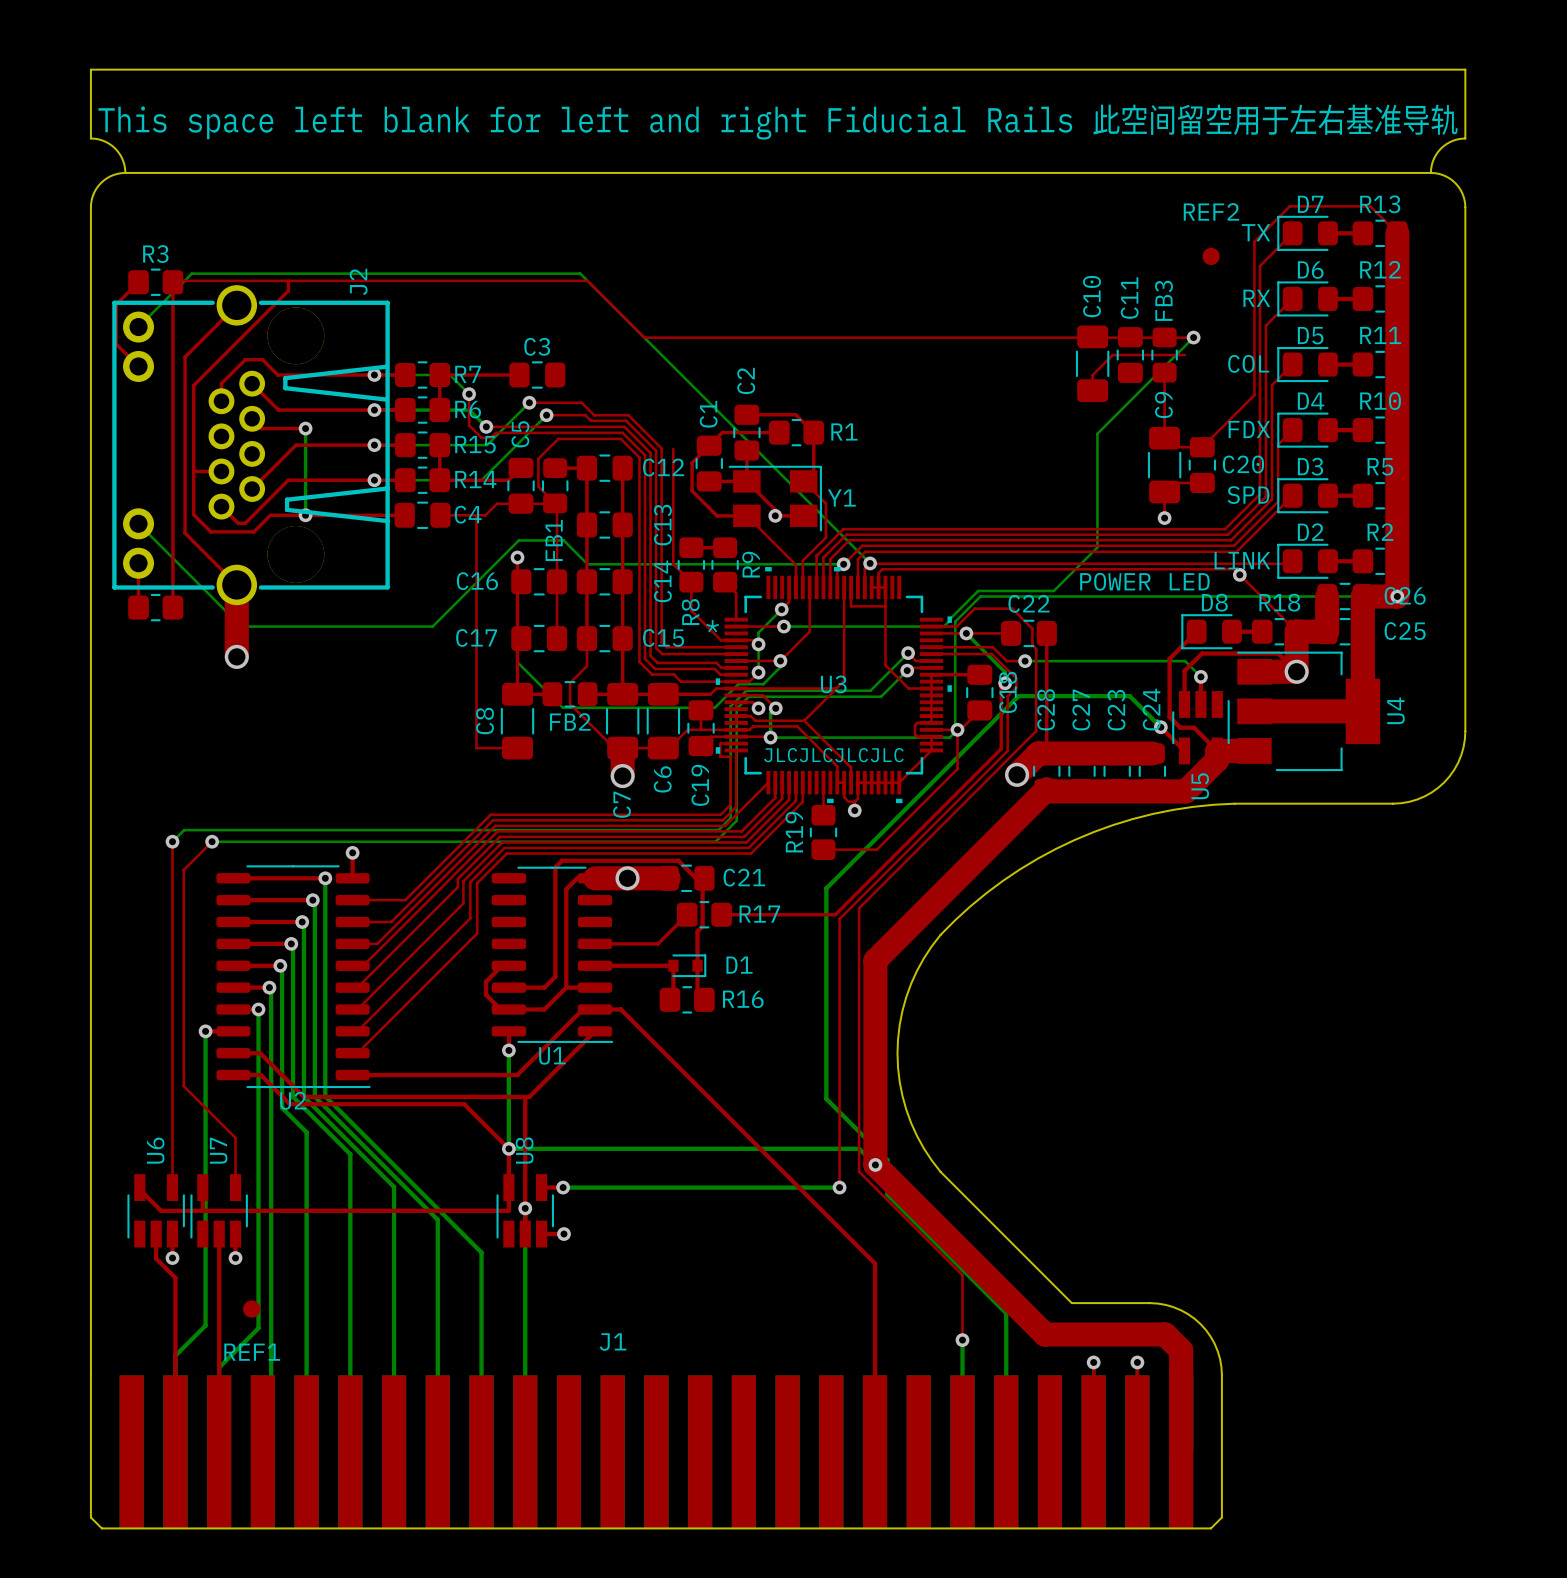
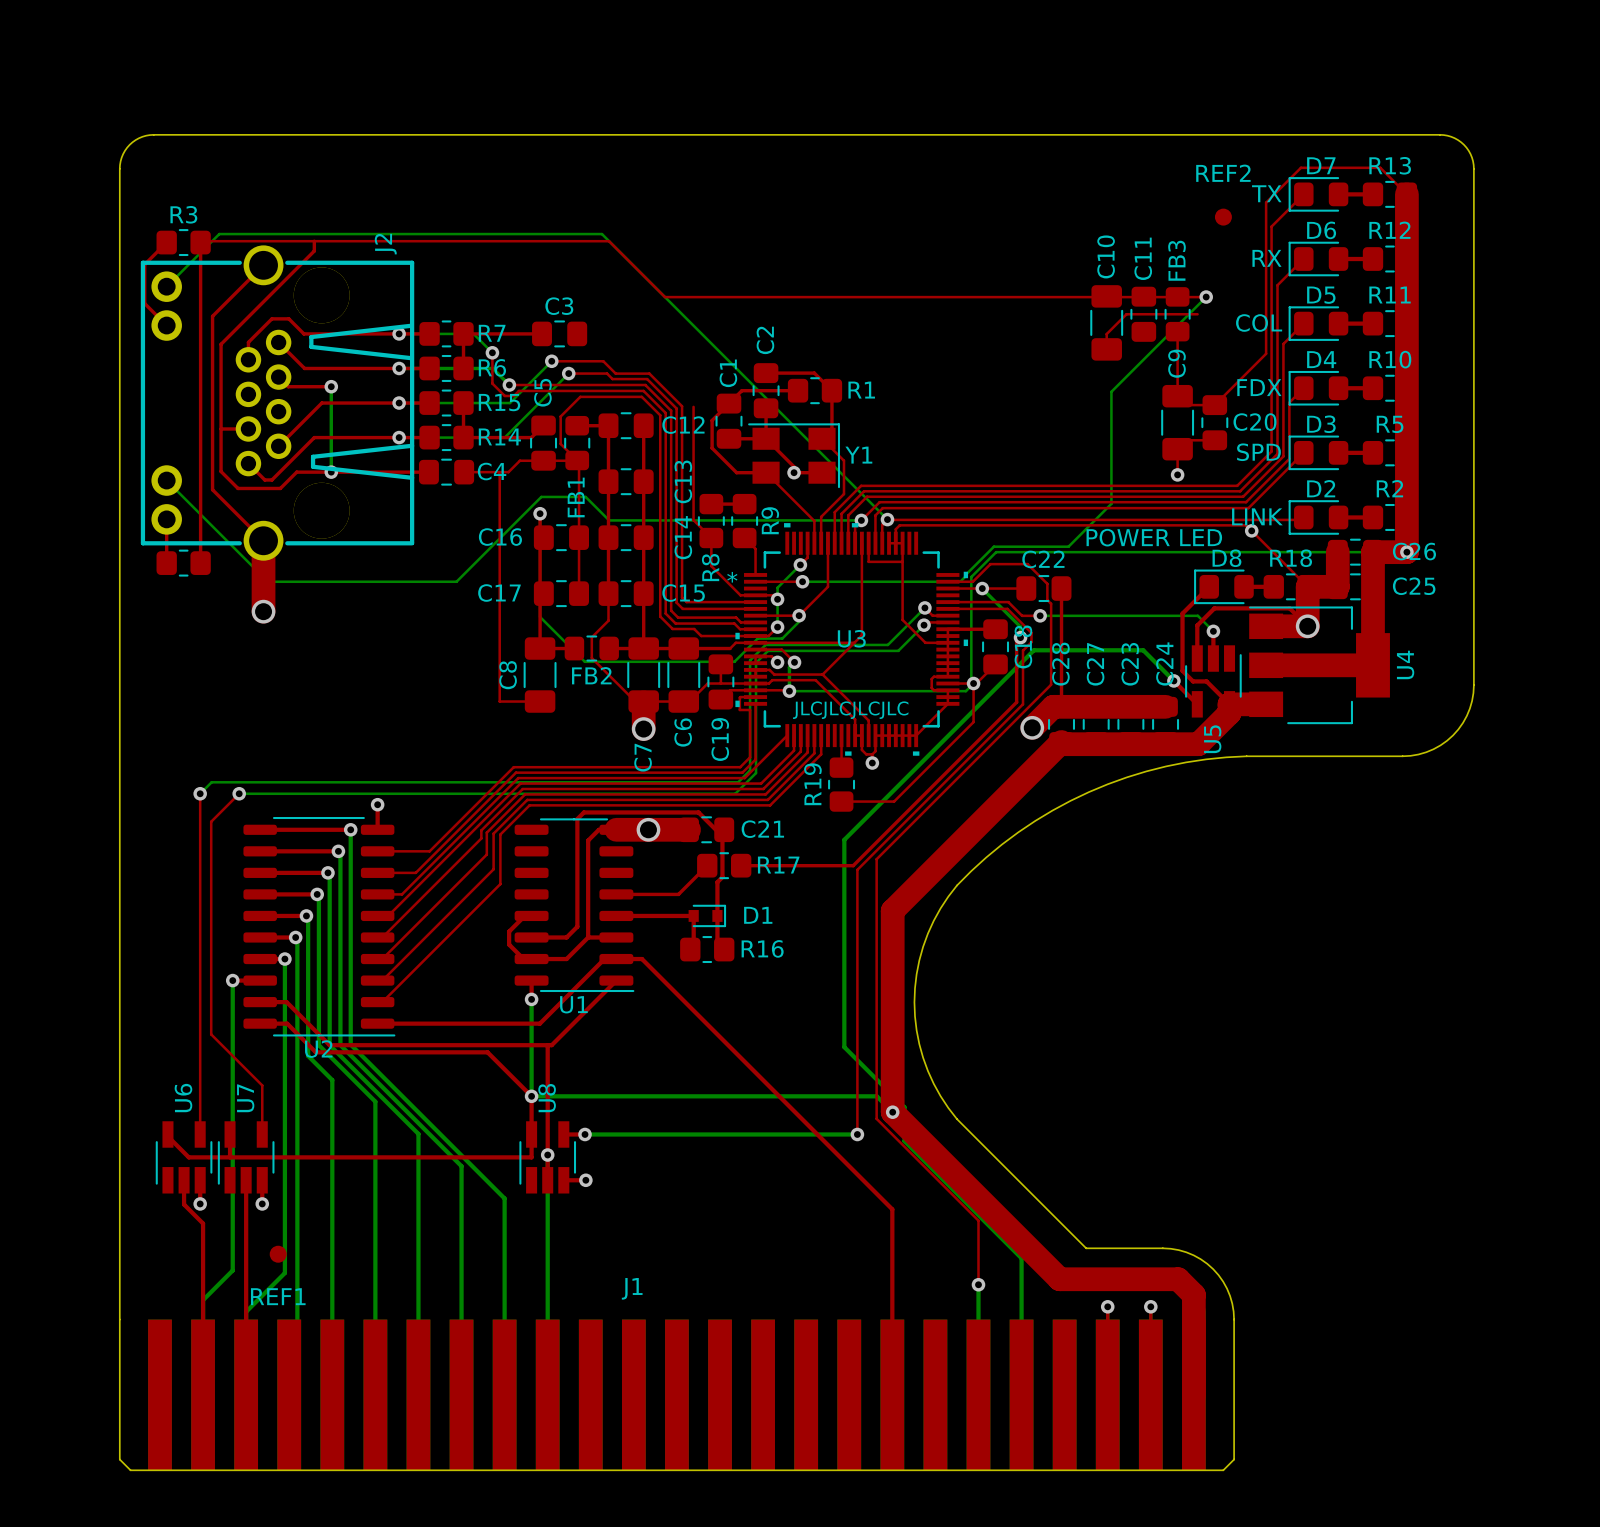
text: This space left blank for left and right Fiducial Rails 此空间留空用于左右基准导轨 (778, 122) -> none
board edge: (125, 172) (121, 158) (115, 148) (105, 141) (90, 138) (90, 69) (1465, 69) (1465, 138) (1450, 141) (1441, 148) (1434, 158) (1430, 172) -> none

